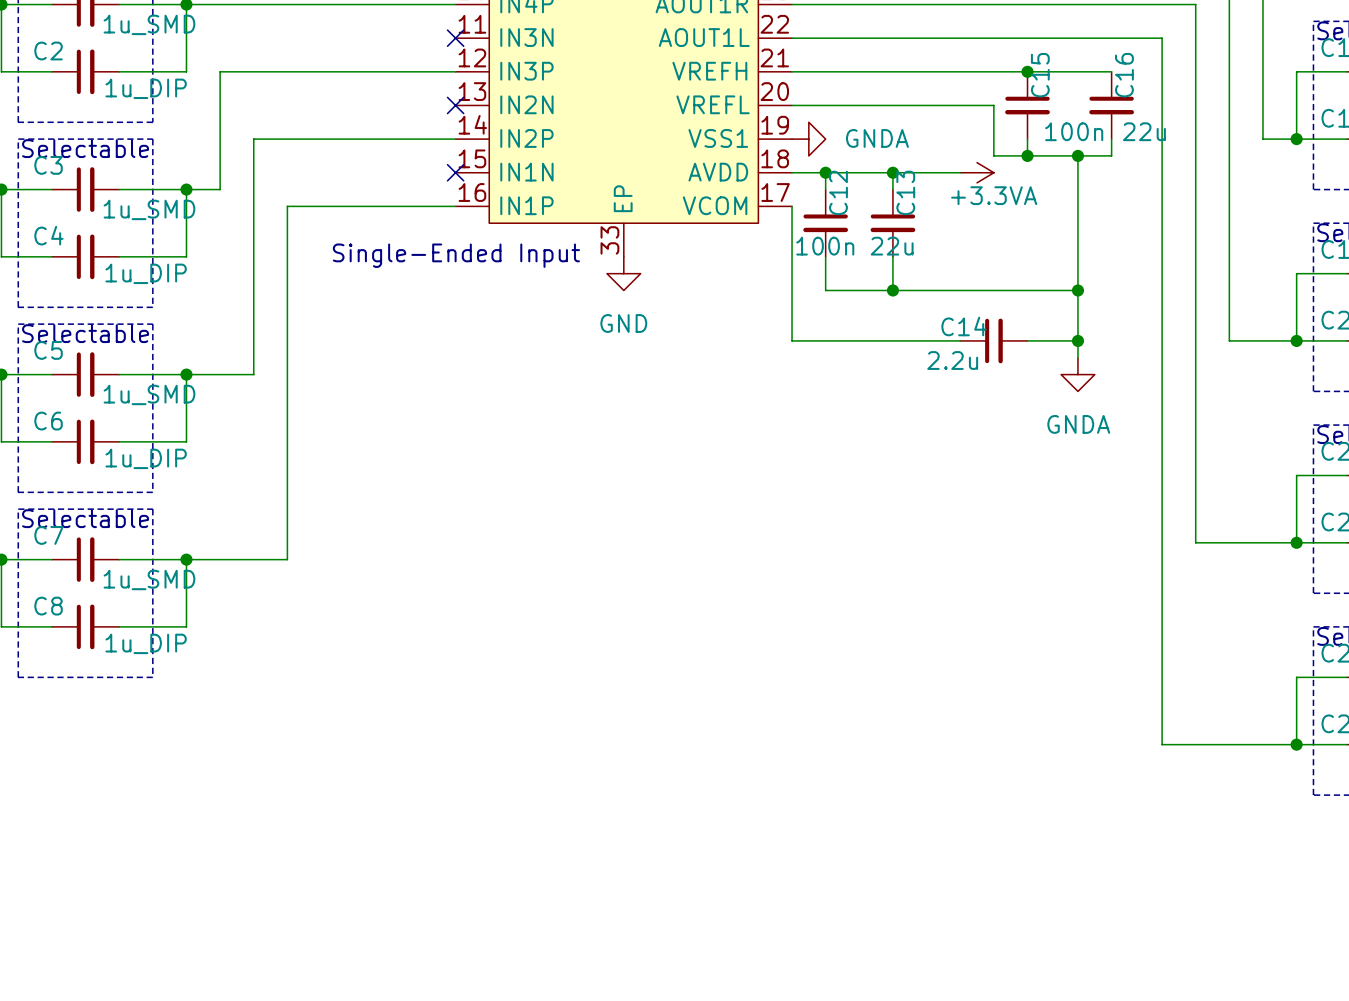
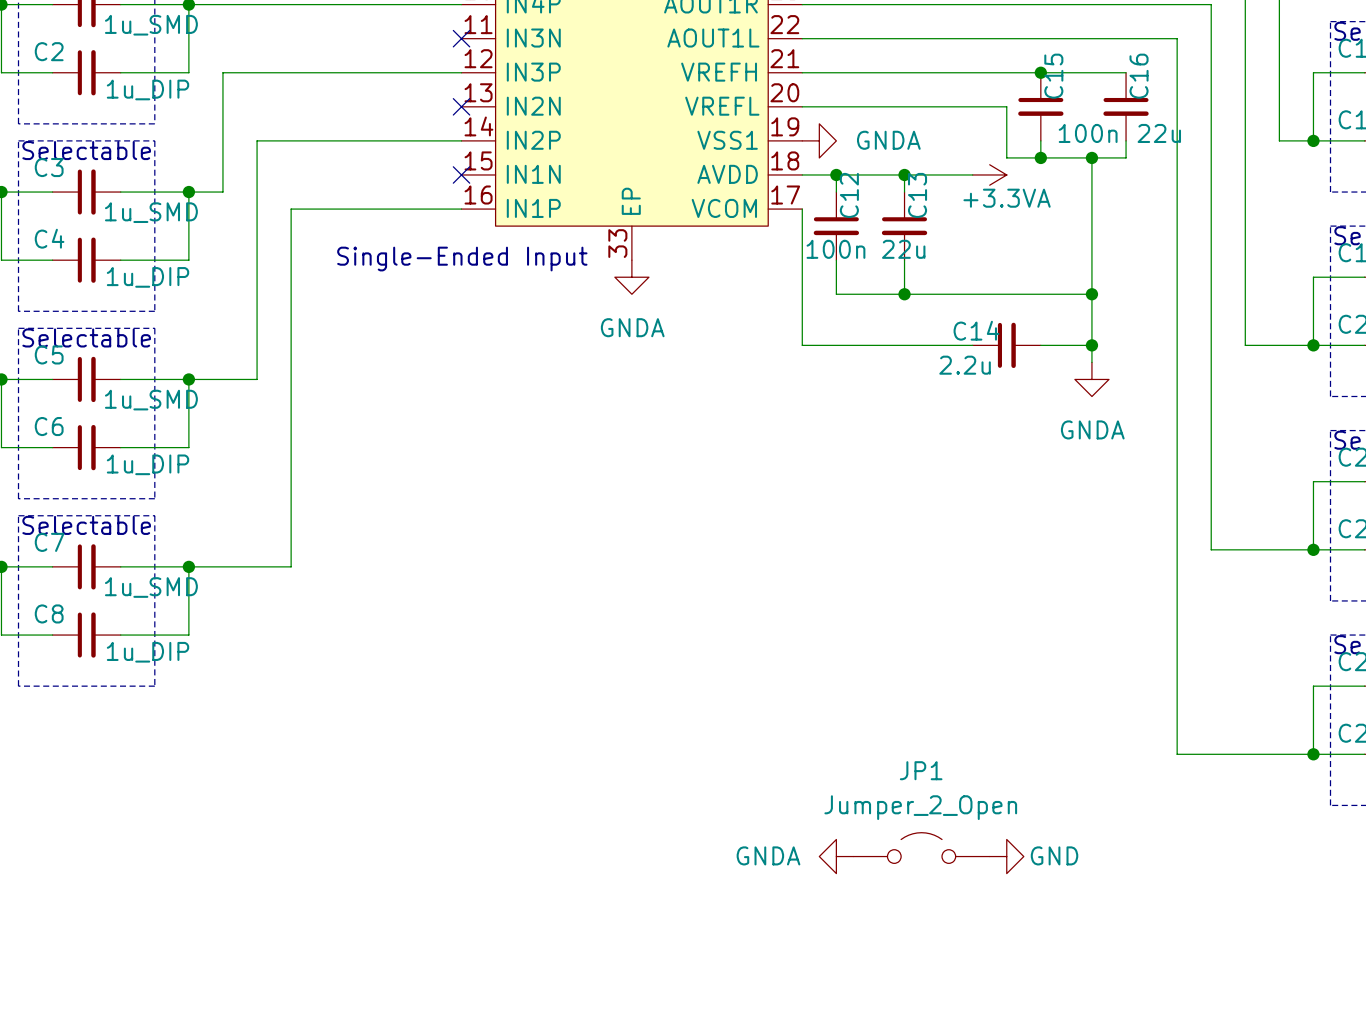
power symbol: GND (623, 273) -> GNDA (631, 277)
JP1: none -> Jumper_2_Open (921, 848)
power symbol: none -> GNDA (836, 856)
power symbol: none -> GND (1006, 856)

